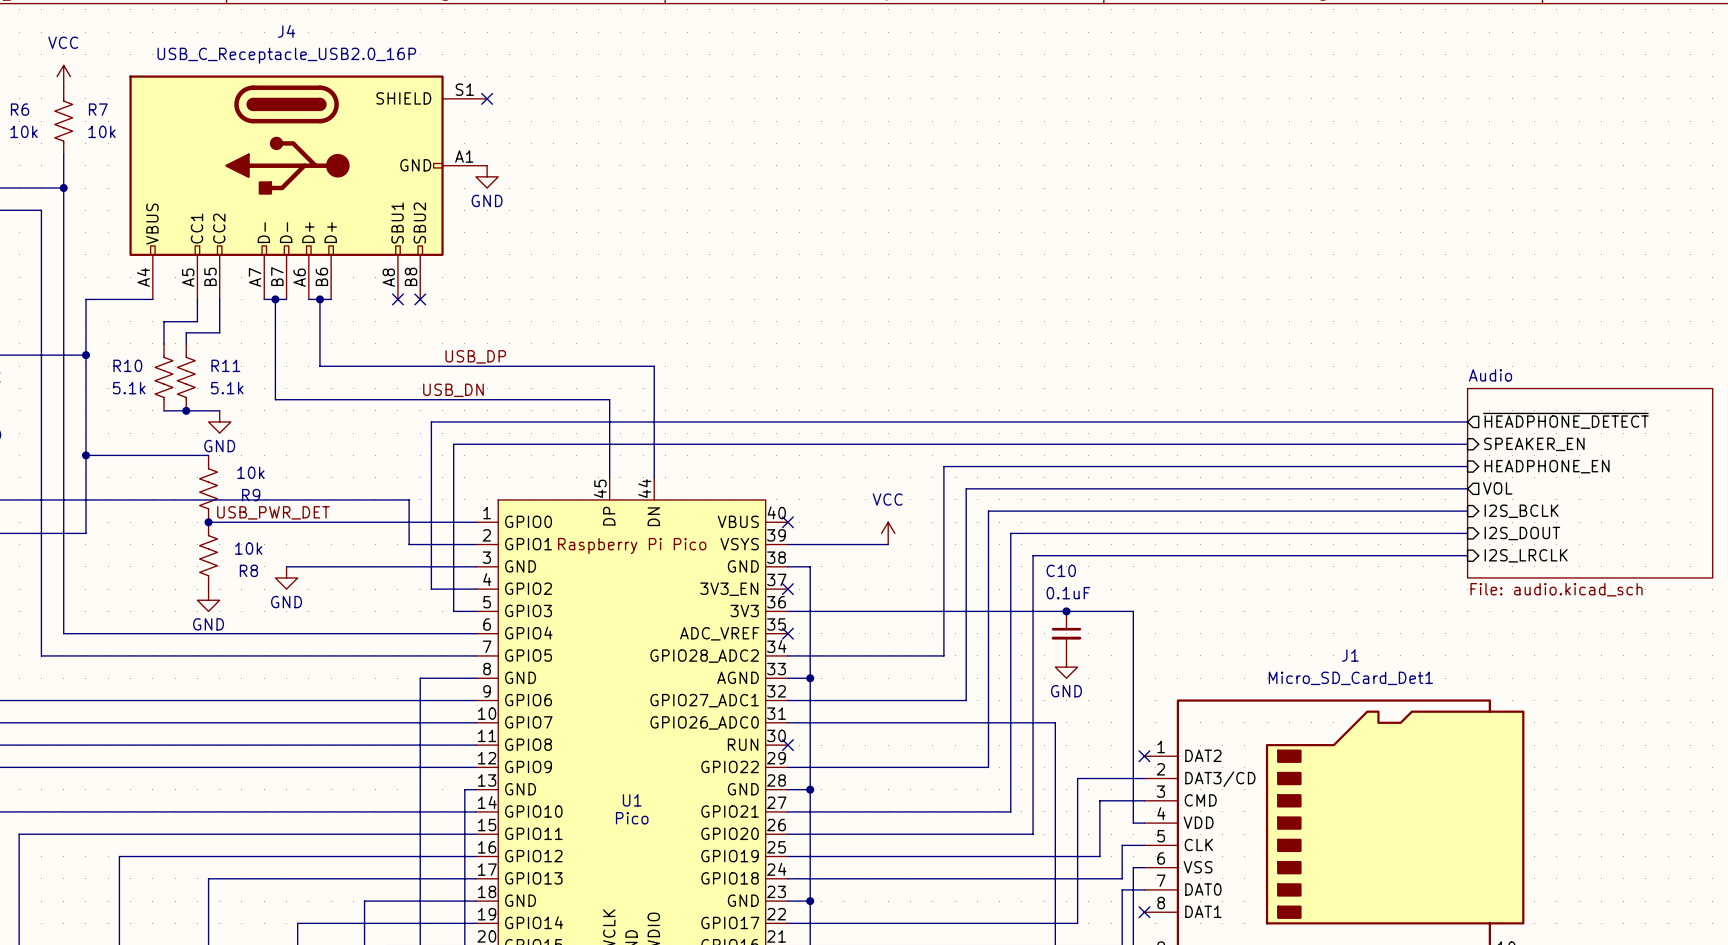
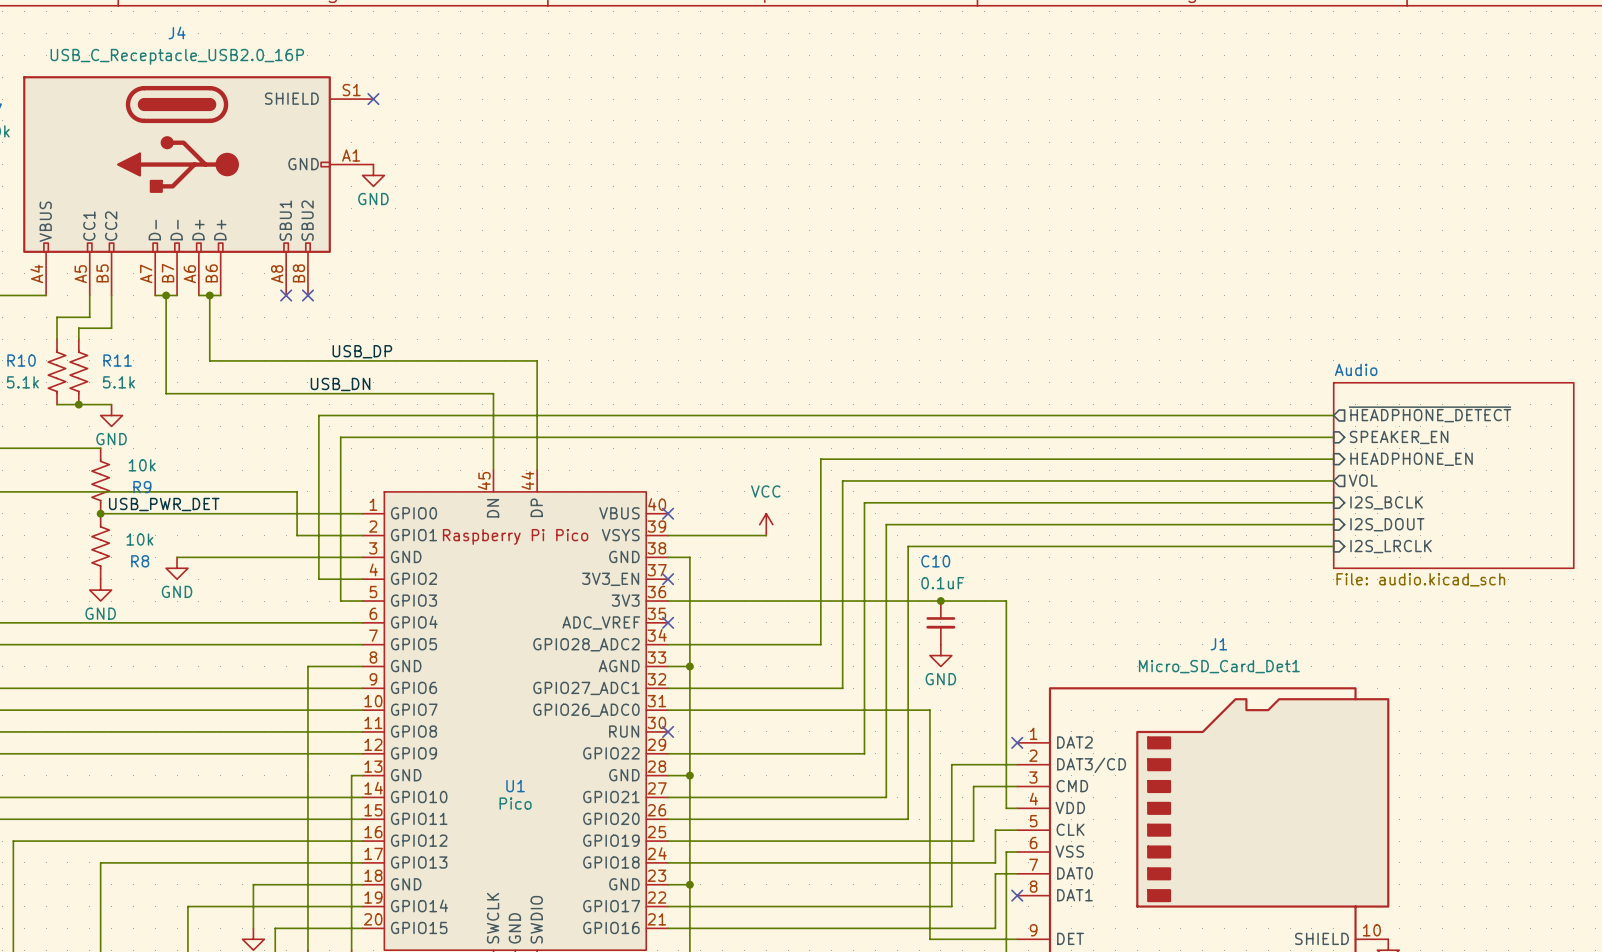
U1 pin name: DP (609, 516) -> DN (493, 508)
U1 pin name: DN (653, 516) -> DP (536, 507)

